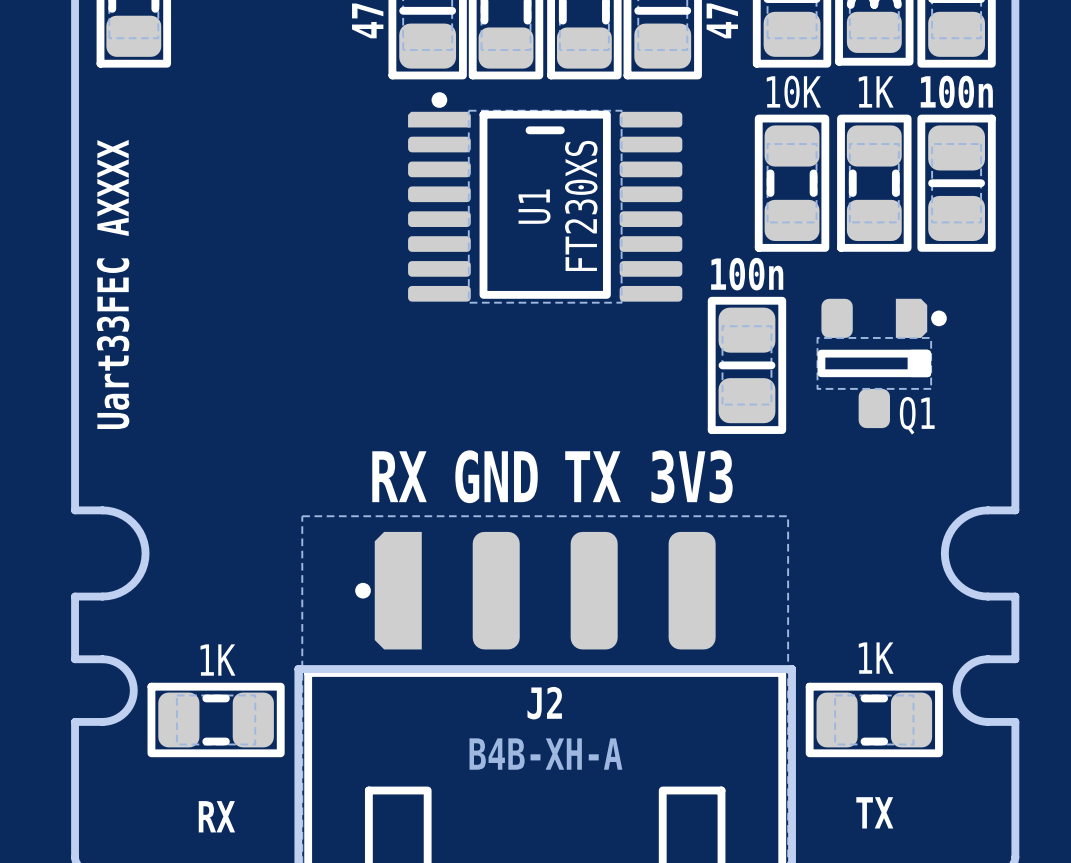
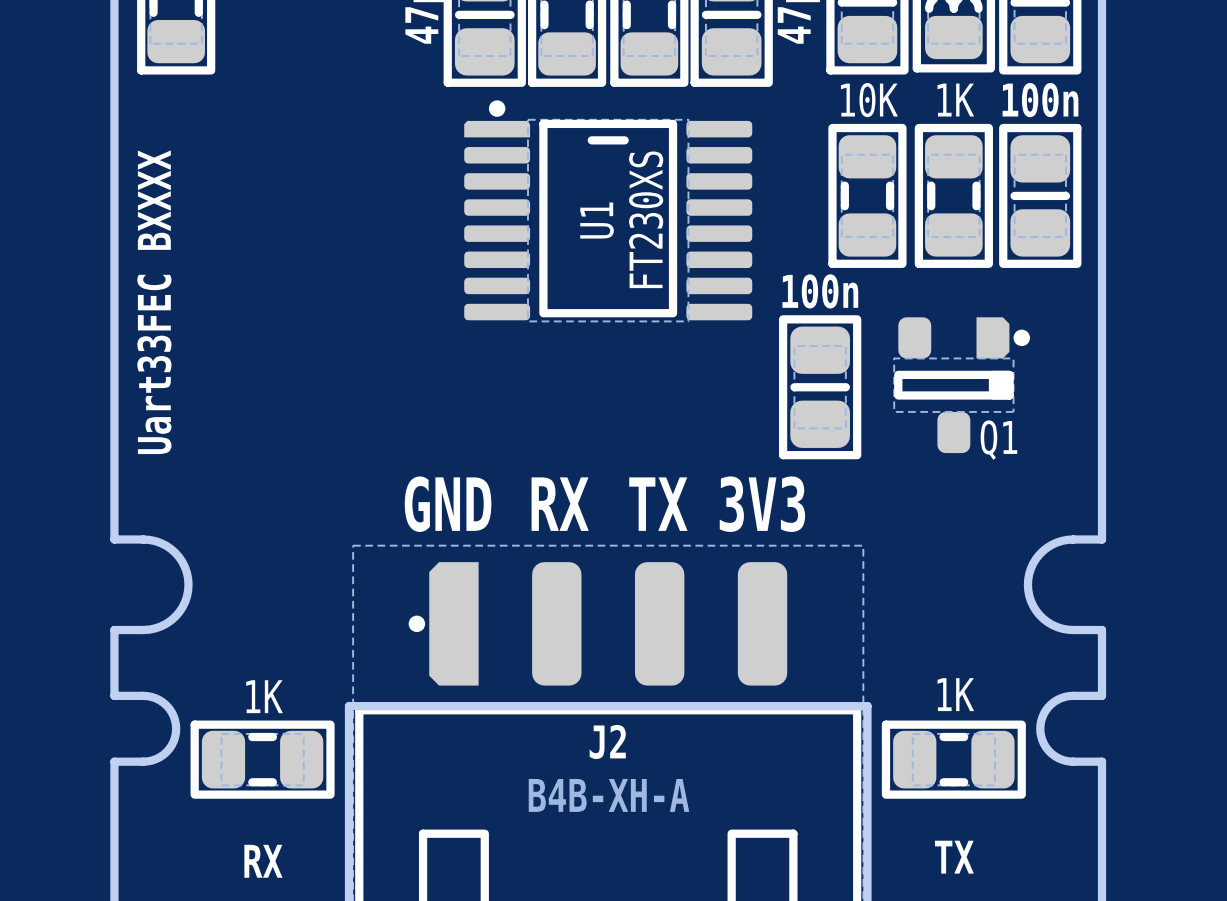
text: Uart33FEC AXXXX (113, 284) -> Uart33FEC BXXXX (154, 302)
text: RX (399, 476) -> GND (448, 504)
text: GND (496, 476) -> RX (560, 504)

